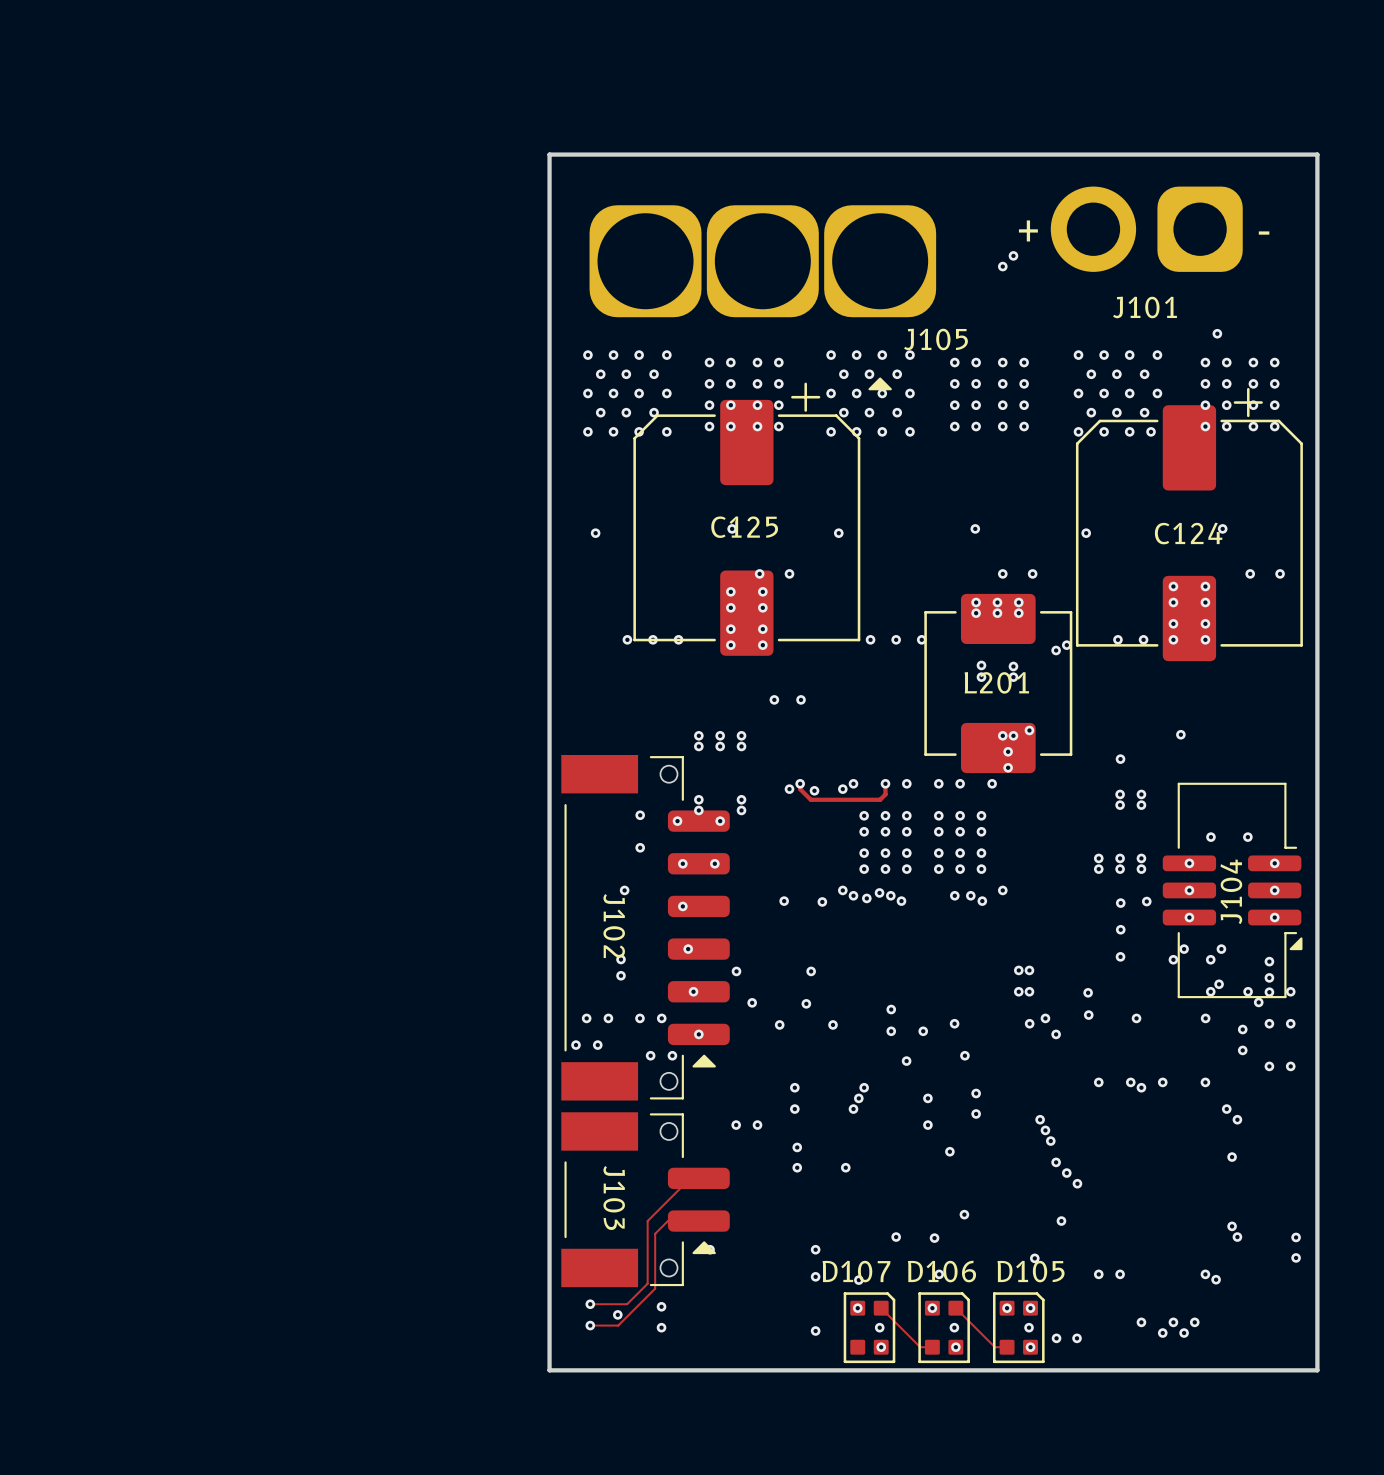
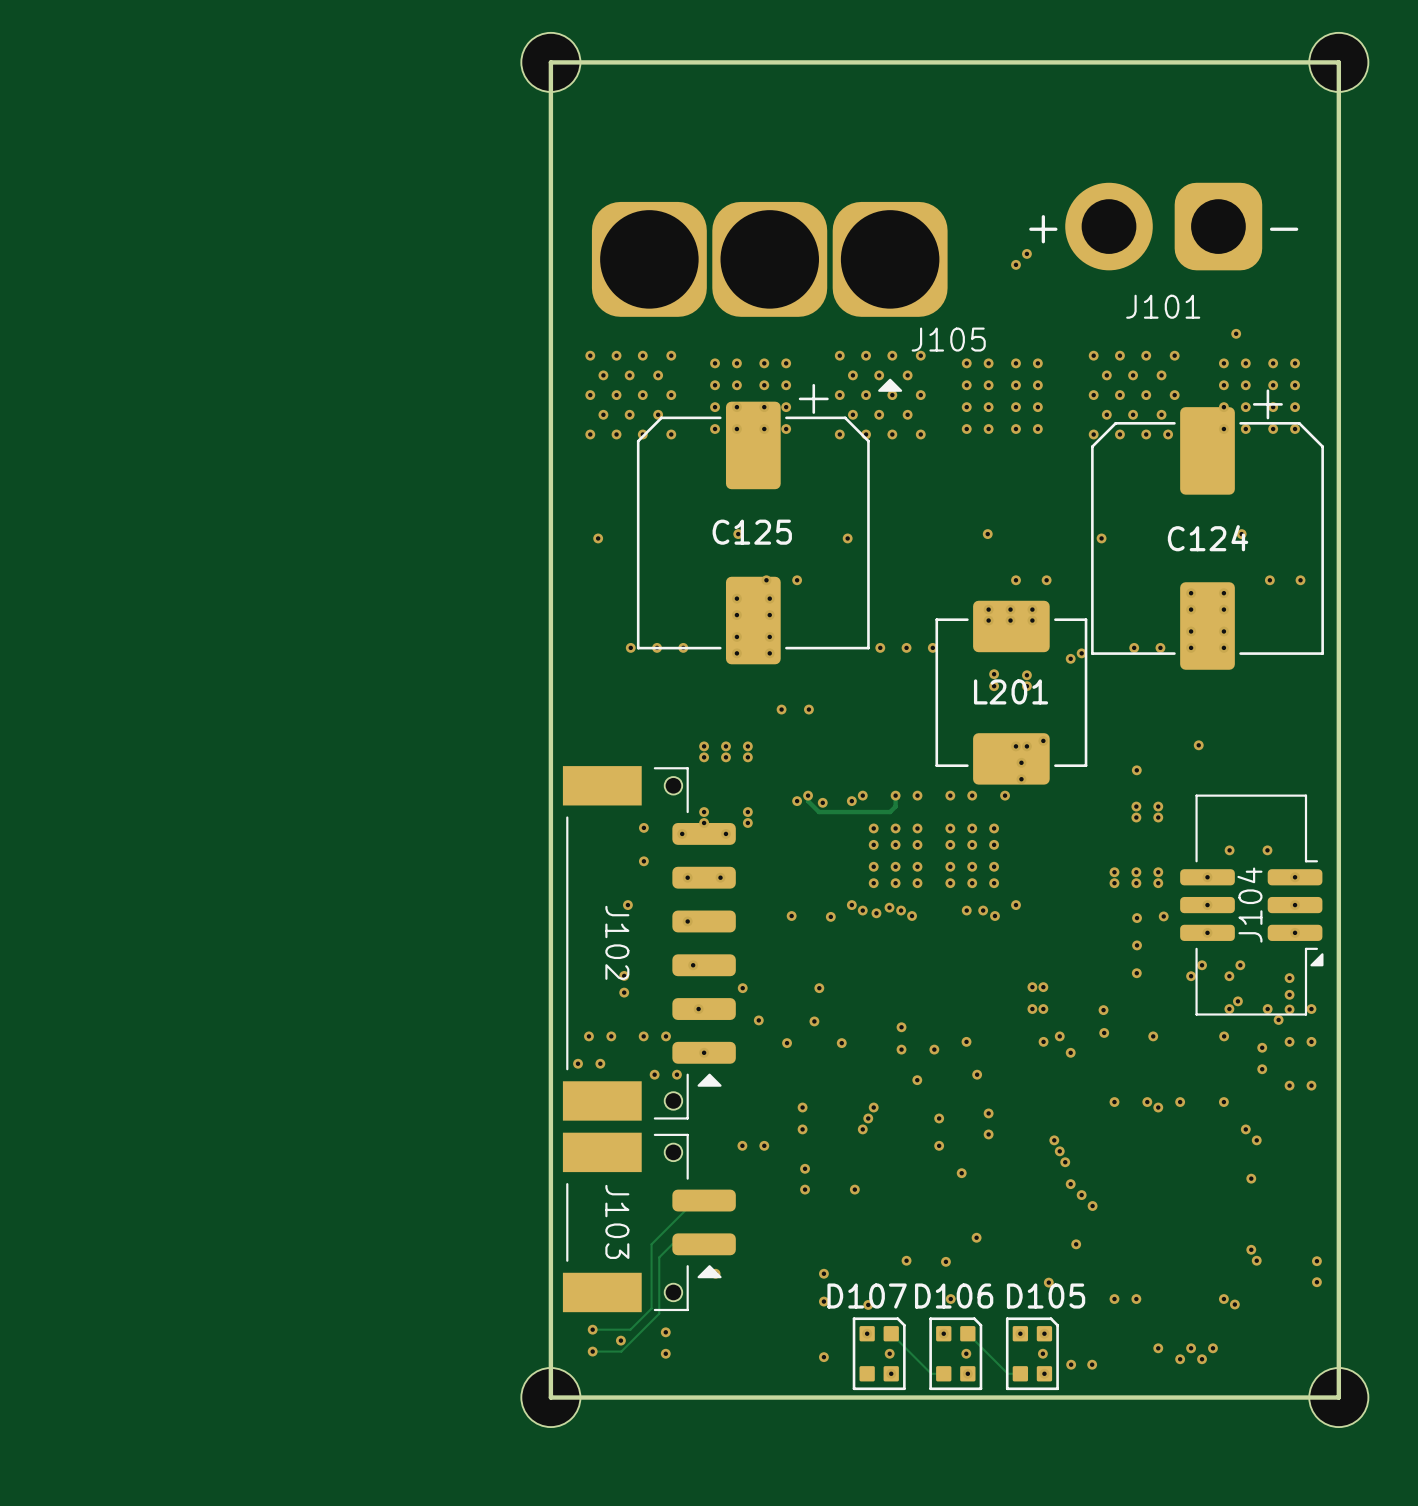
part: none -> (550, 62)
part: none -> (1338, 62)
board edge: (549, 154) (1317, 154) -> (550, 149) (550, 62) (1338, 62) (1338, 149)
part: none -> (550, 1397)
part: none -> (1338, 1397)

